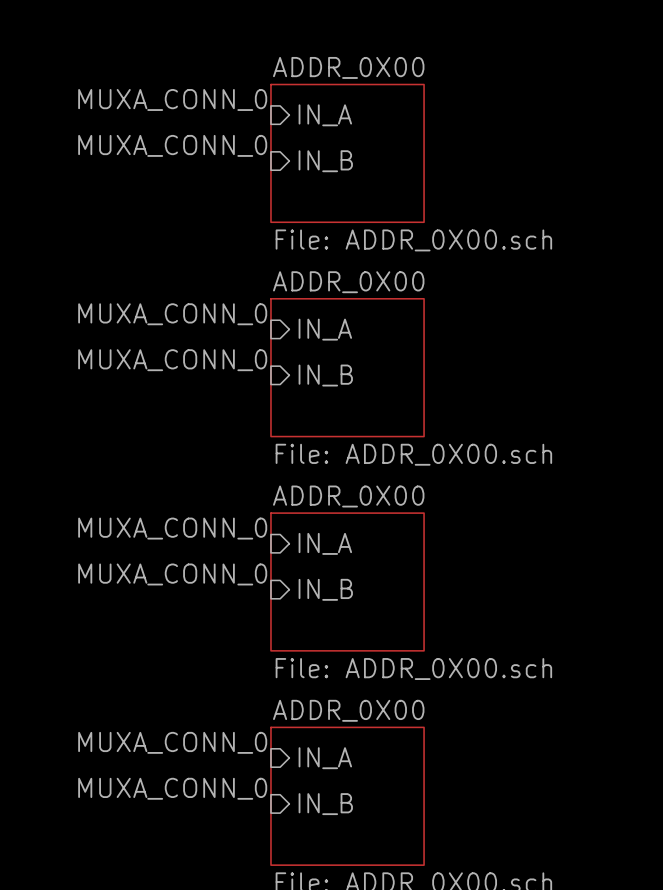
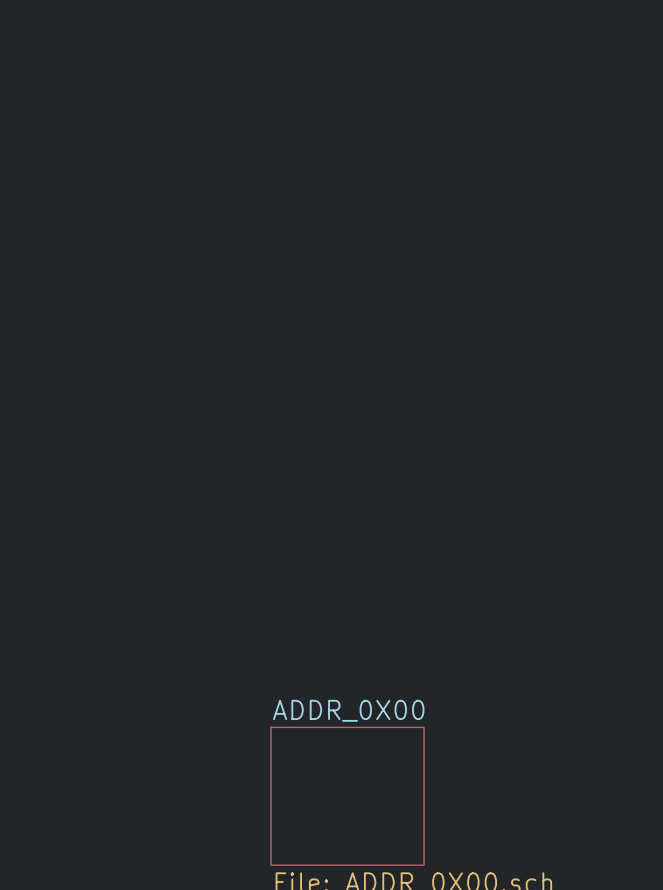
label: MUXA_CONN_0 (172, 99) -> none
sheet pin: IN_A (325, 115) -> none
label: MUXA_CONN_0 (172, 145) -> none
sheet ADDR_0X00: File: ADDR_0X00.sch (347, 153) -> none
sheet pin: IN_B (325, 161) -> none
label: MUXA_CONN_0 (172, 314) -> none
sheet pin: IN_A (325, 329) -> none
label: MUXA_CONN_0 (172, 360) -> none
sheet ADDR_0X00: File: ADDR_0X00.sch (347, 367) -> none
sheet pin: IN_B (325, 375) -> none
label: MUXA_CONN_0 (172, 528) -> none
sheet pin: IN_A (325, 543) -> none
label: MUXA_CONN_0 (172, 574) -> none
sheet ADDR_0X00: File: ADDR_0X00.sch (347, 581) -> none
sheet pin: IN_B (325, 589) -> none
label: MUXA_CONN_0 (172, 742) -> none
sheet pin: IN_A (325, 758) -> none
label: MUXA_CONN_0 (172, 788) -> none
sheet pin: IN_B (325, 804) -> none

